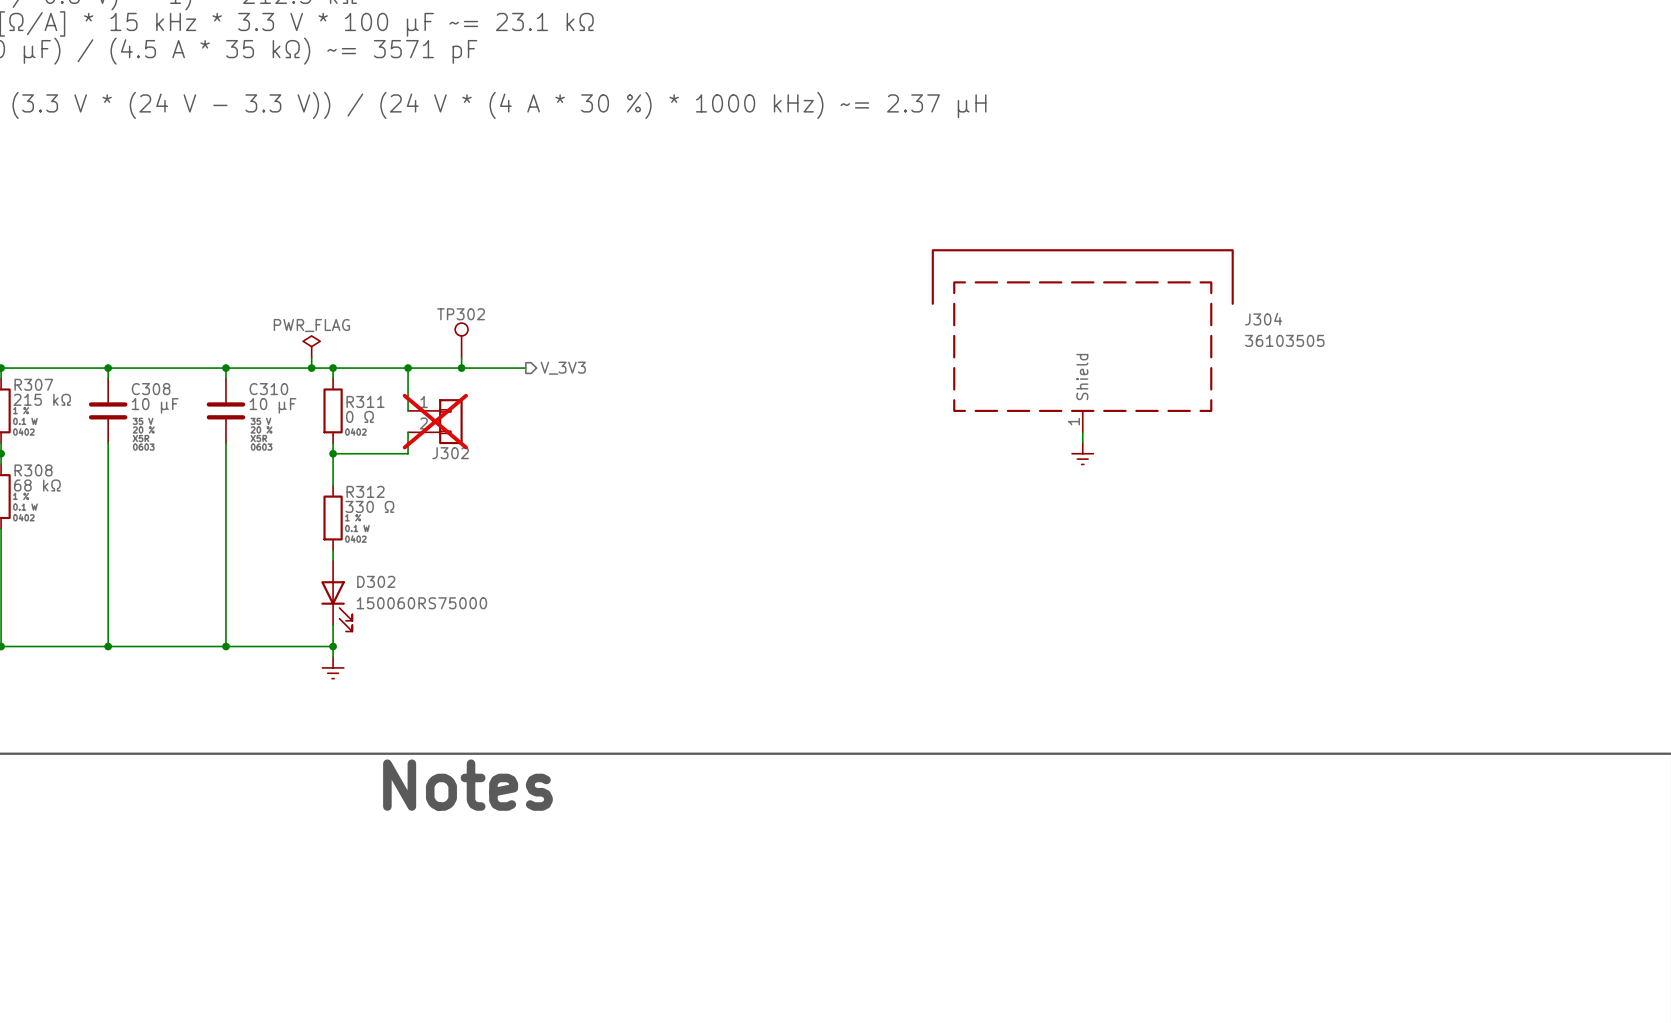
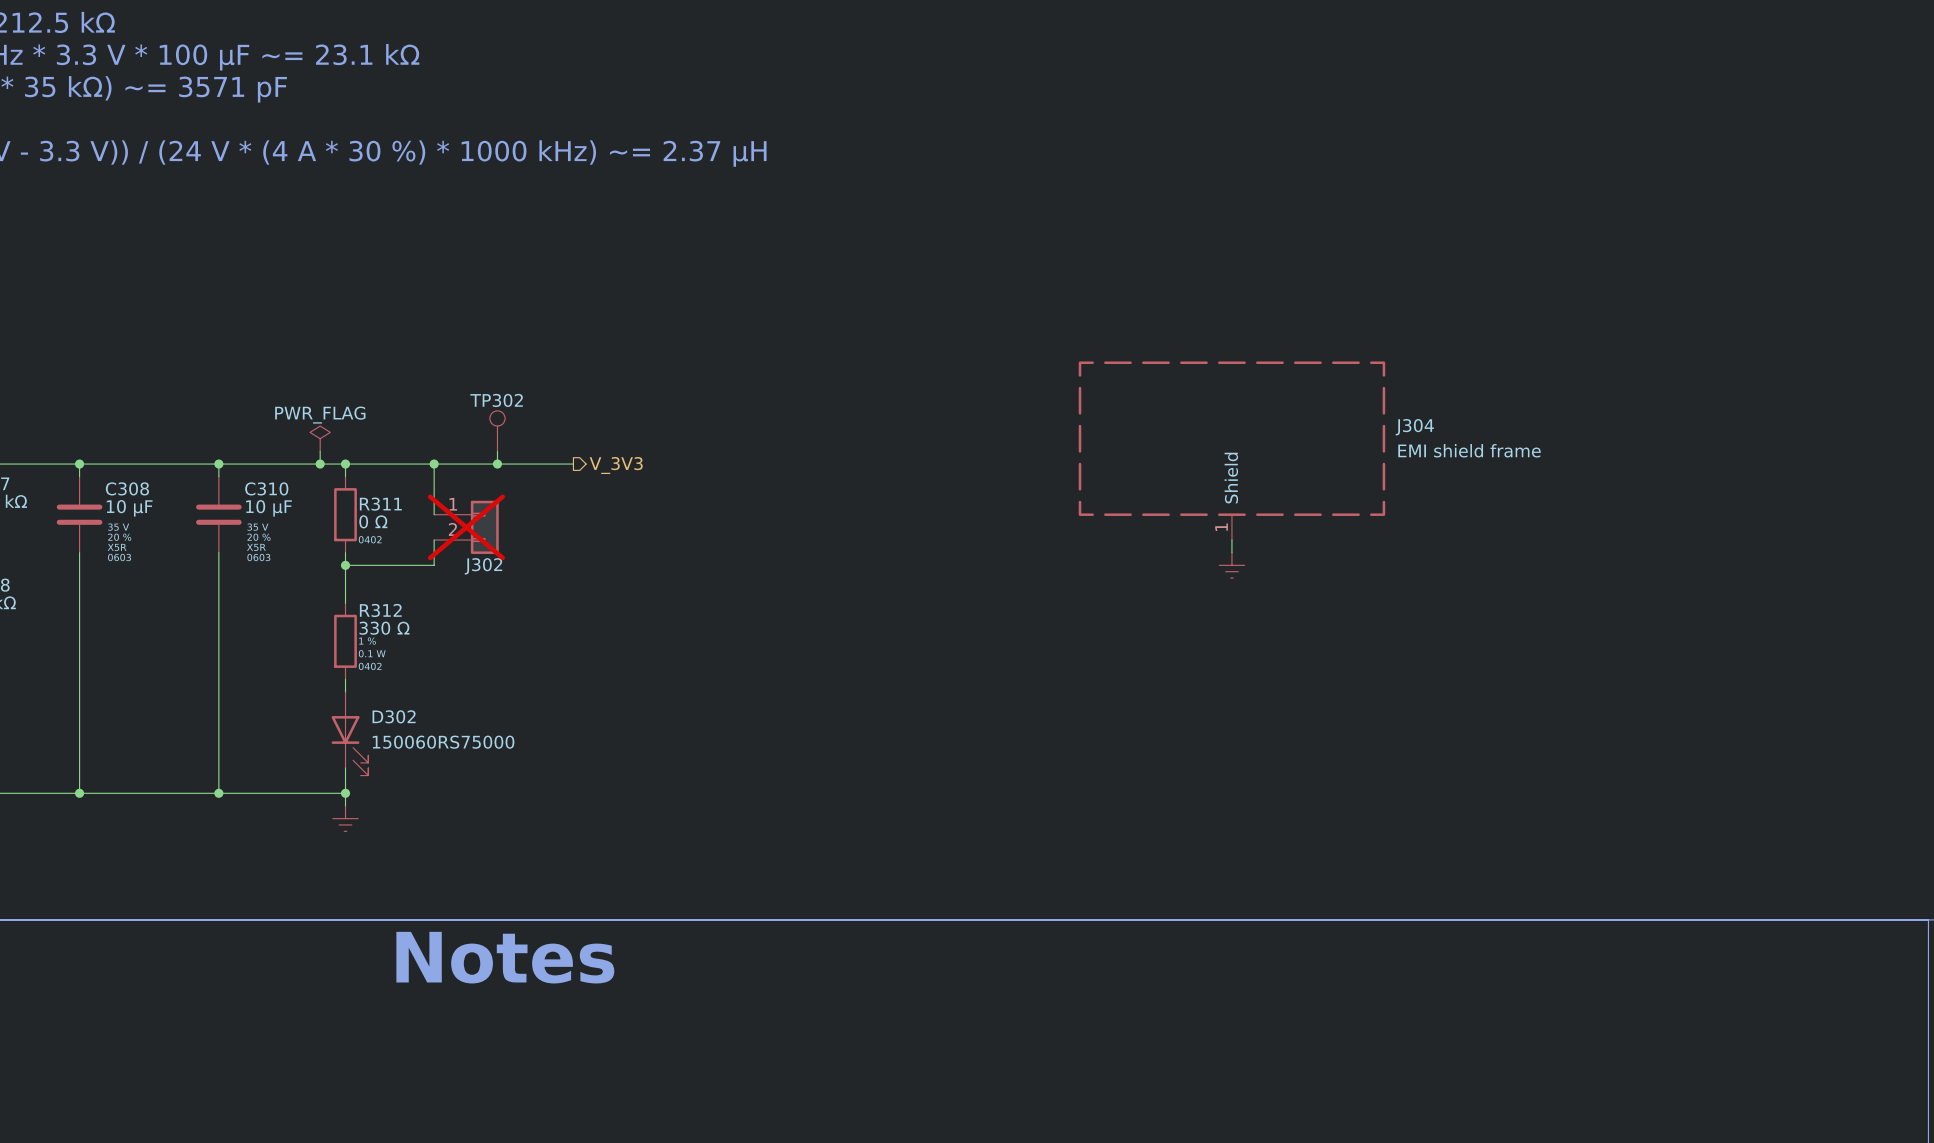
J304 symbol: [931, 249, 1234, 433] -> [1078, 361, 1386, 541]
J304 name position: J304 (1263, 319) -> J304 (1414, 427)
J304 value: 36103505 (1284, 340) -> EMI shield frame (1469, 450)

